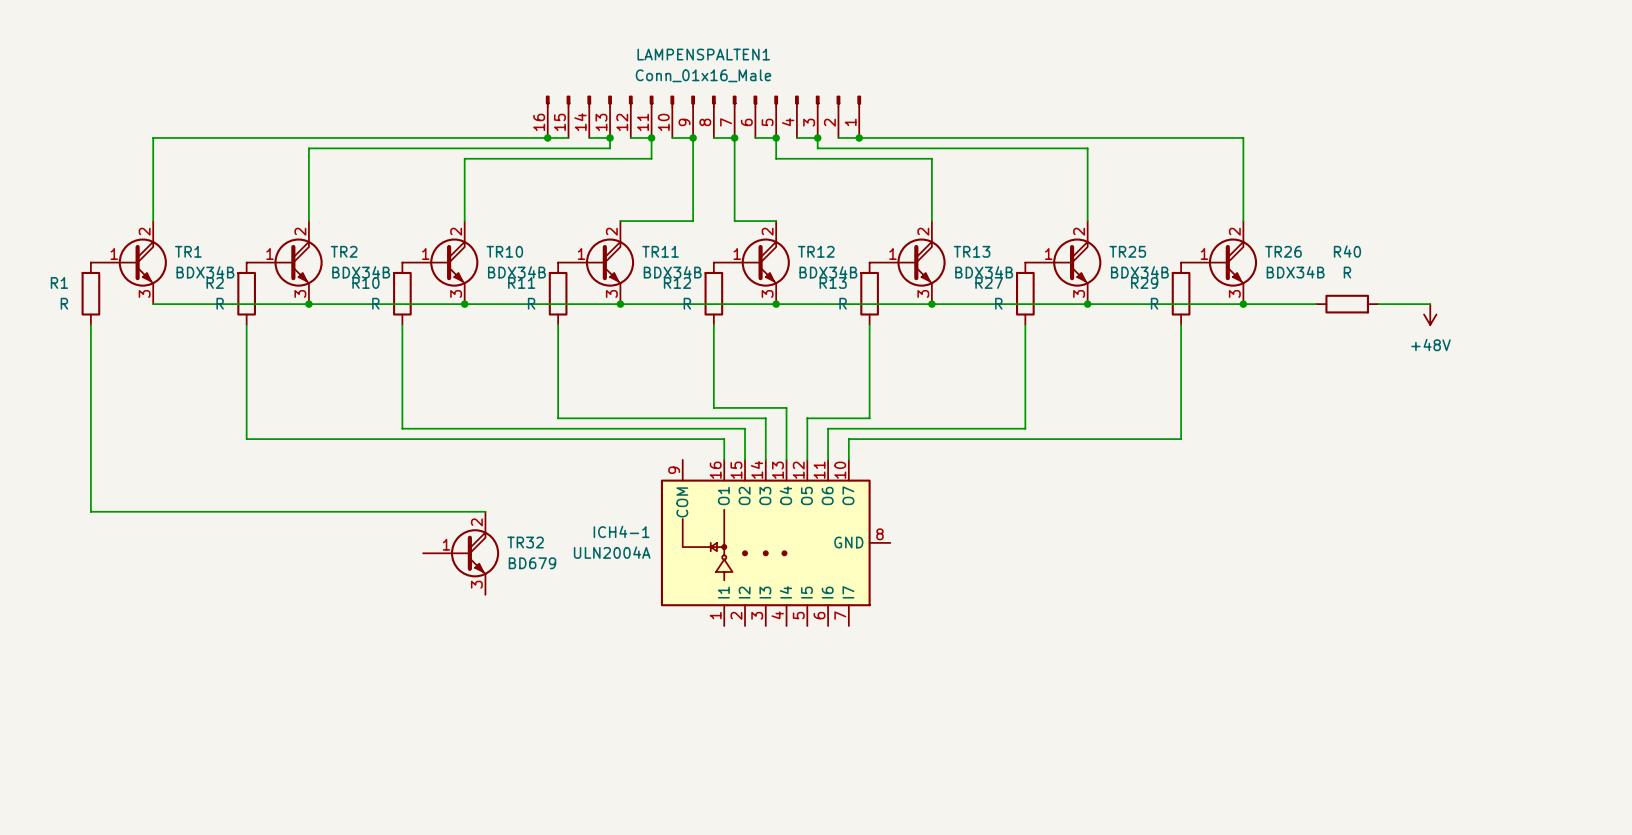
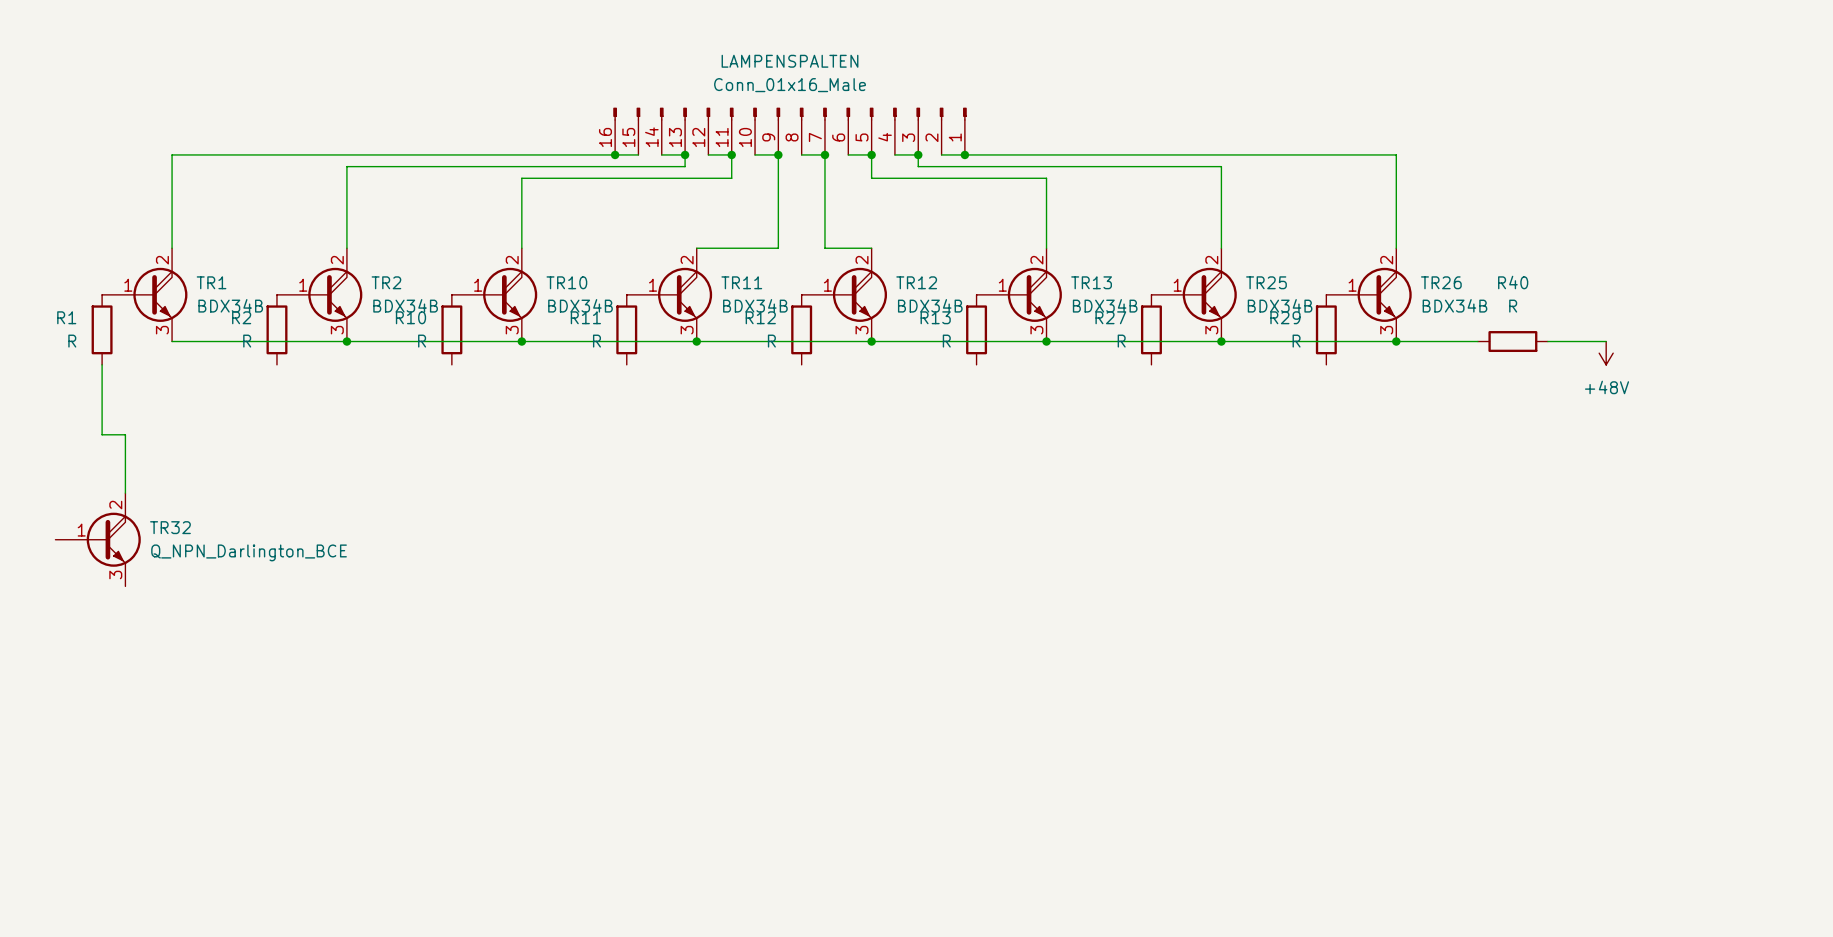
LAMPENSPALTEN1 name: LAMPENSPALTEN1 (703, 54) -> LAMPENSPALTEN (790, 61)
wire: (246, 324) (246, 439) (724, 439) (724, 459) -> none
wire: (402, 324) (402, 428) (745, 428) (745, 459) -> none
wire: (558, 324) (558, 418) (765, 418) (765, 459) -> none
wire: (713, 324) (713, 407) (786, 407) (786, 459) -> none
wire: (869, 324) (869, 418) (807, 418) (807, 459) -> none
wire: (1025, 324) (1025, 428) (828, 428) (828, 459) -> none
wire: (1181, 324) (1181, 439) (848, 439) (848, 459) -> none
wire: (90, 387) (90, 511) (485, 511) -> (102, 434) (125, 434) (125, 493)
ICH4-1: ULN2004A (775, 542) -> none
TR32 position: (461, 553) -> (98, 539)
TR32 value: BD679 (532, 563) -> Q_NPN_Darlington_BCE (249, 552)

